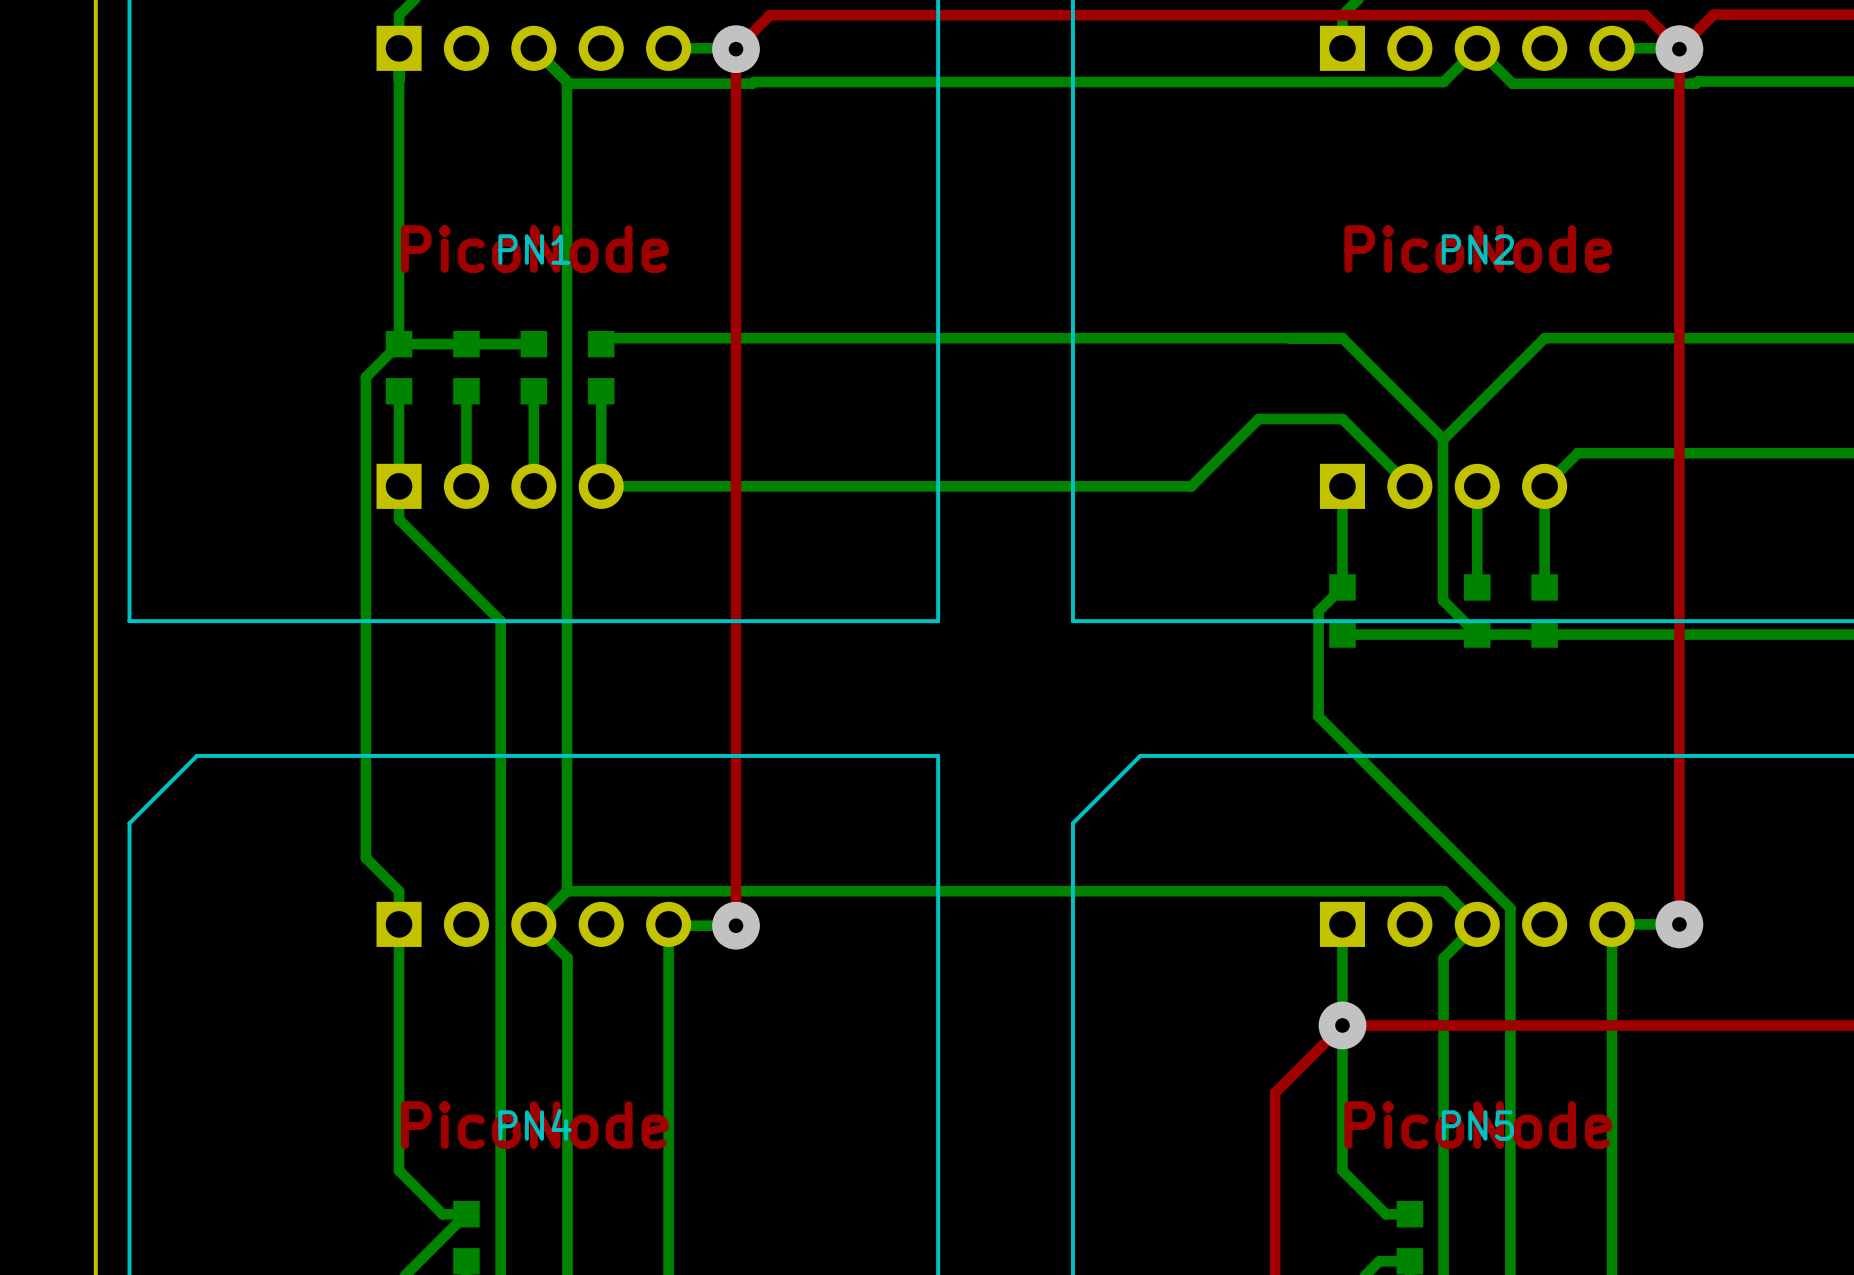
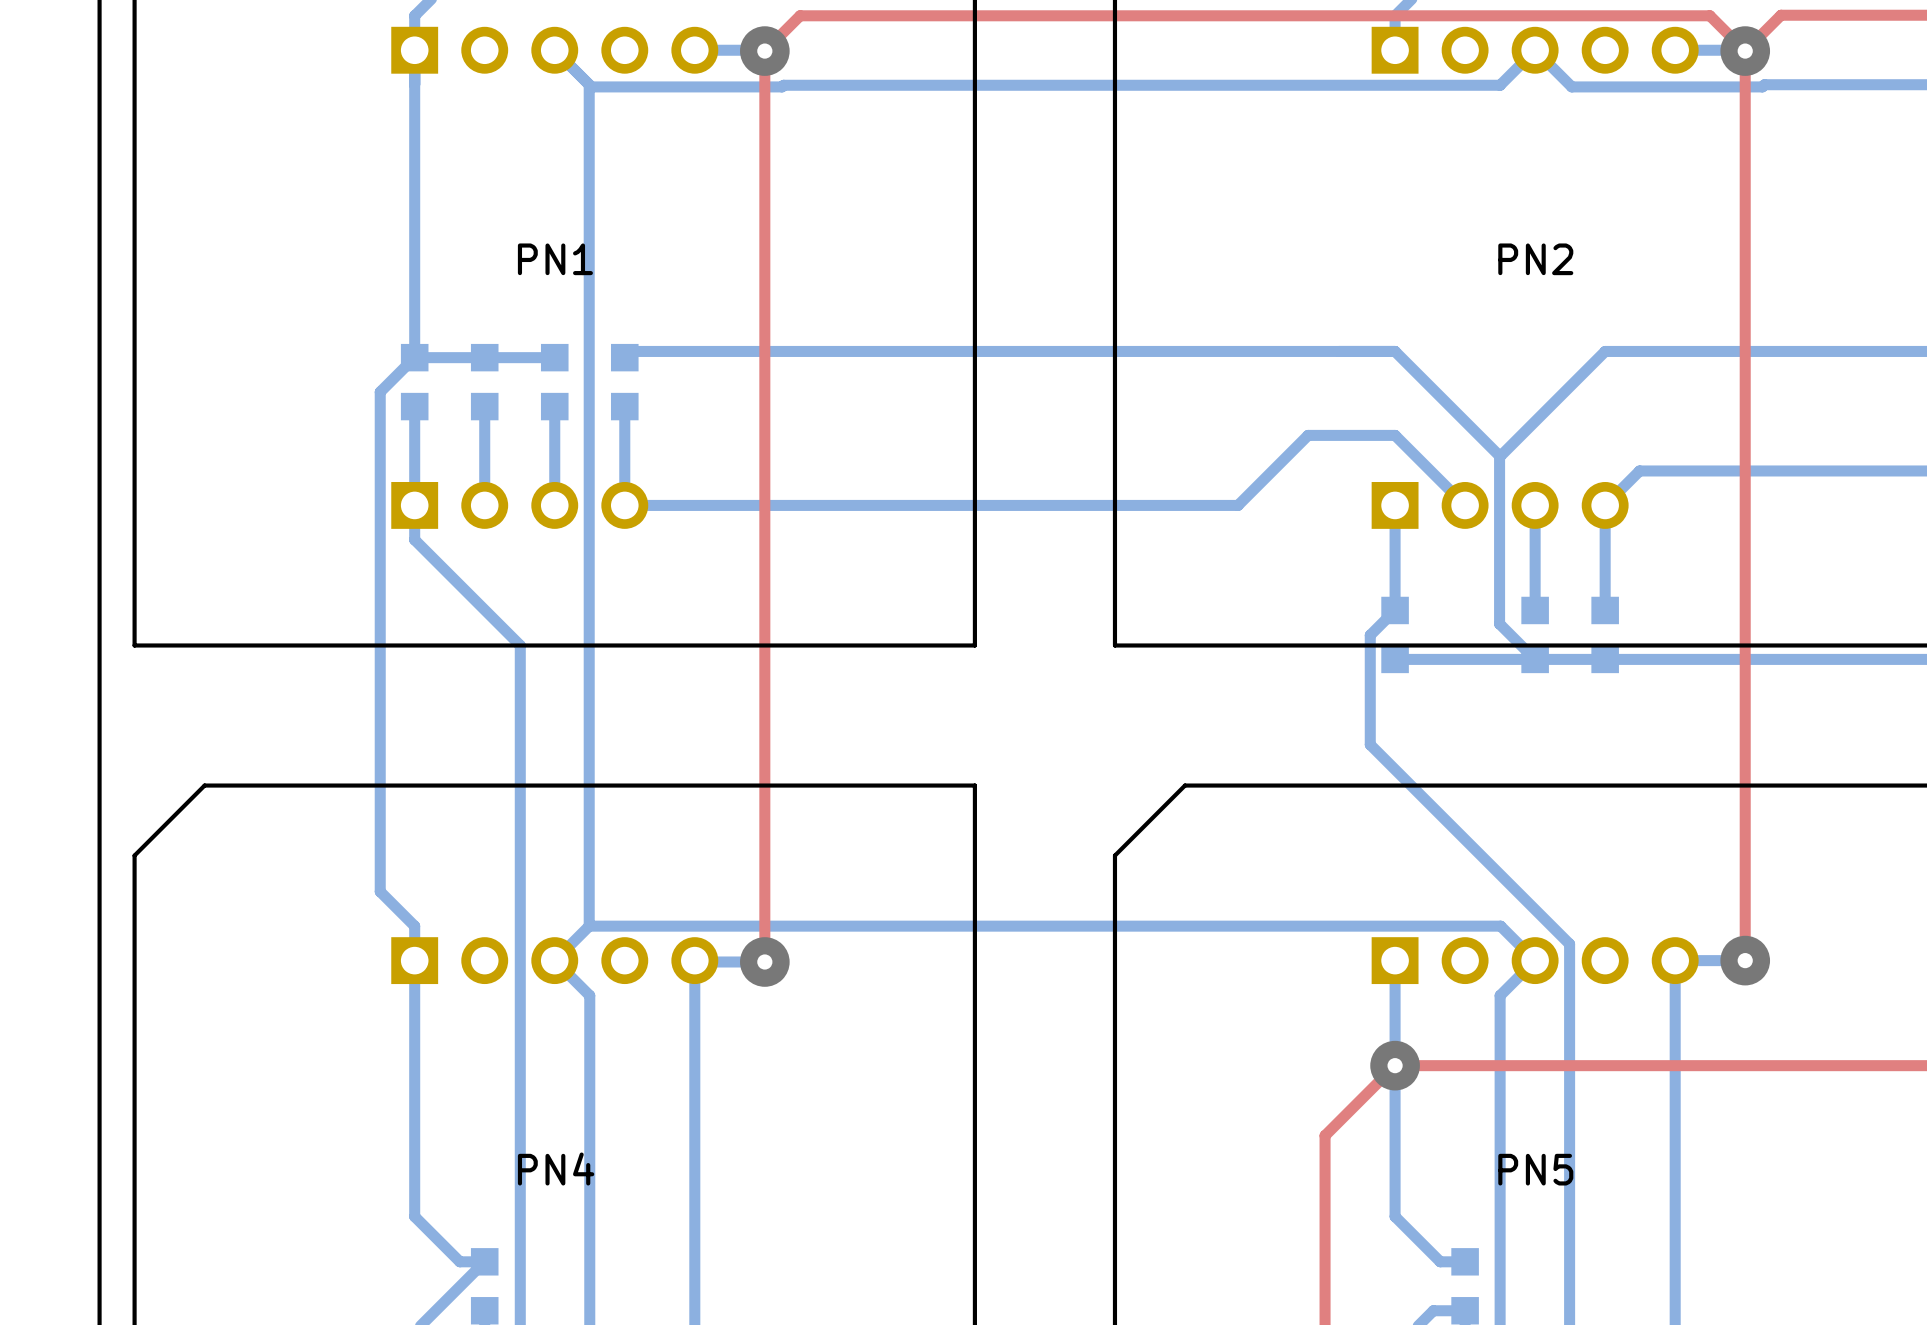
text: PicoNode (534, 249) -> none
text: PicoNode (1478, 249) -> none
text: PicoNode (534, 1125) -> none
text: PicoNode (1478, 1125) -> none

